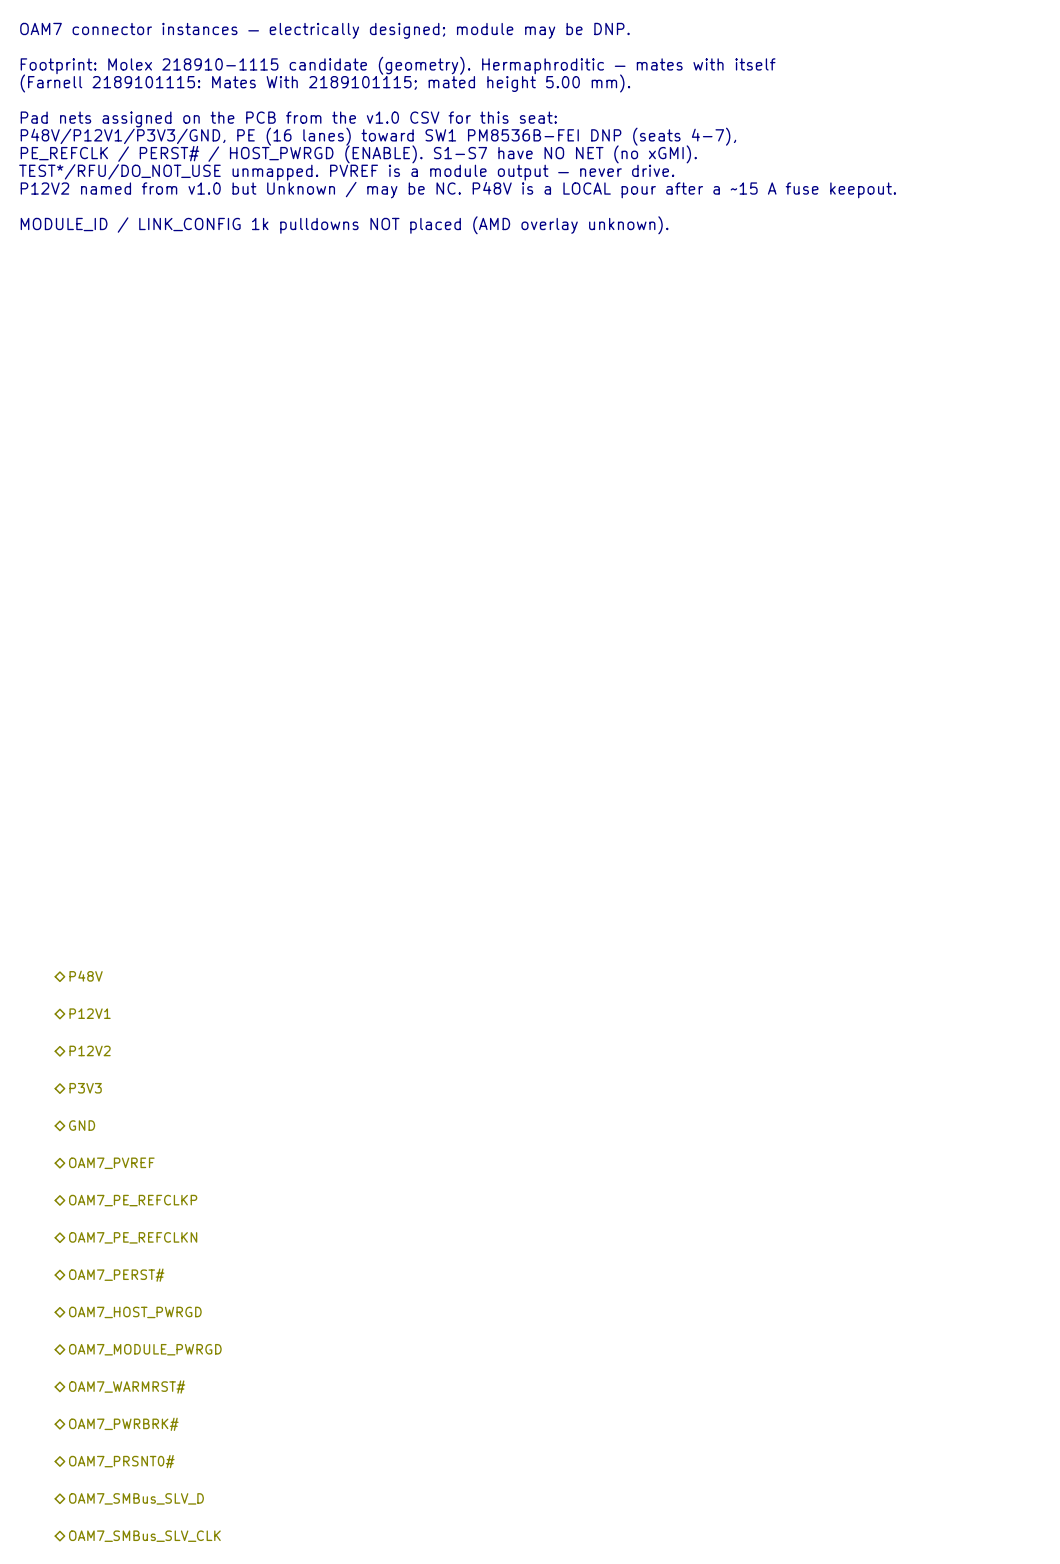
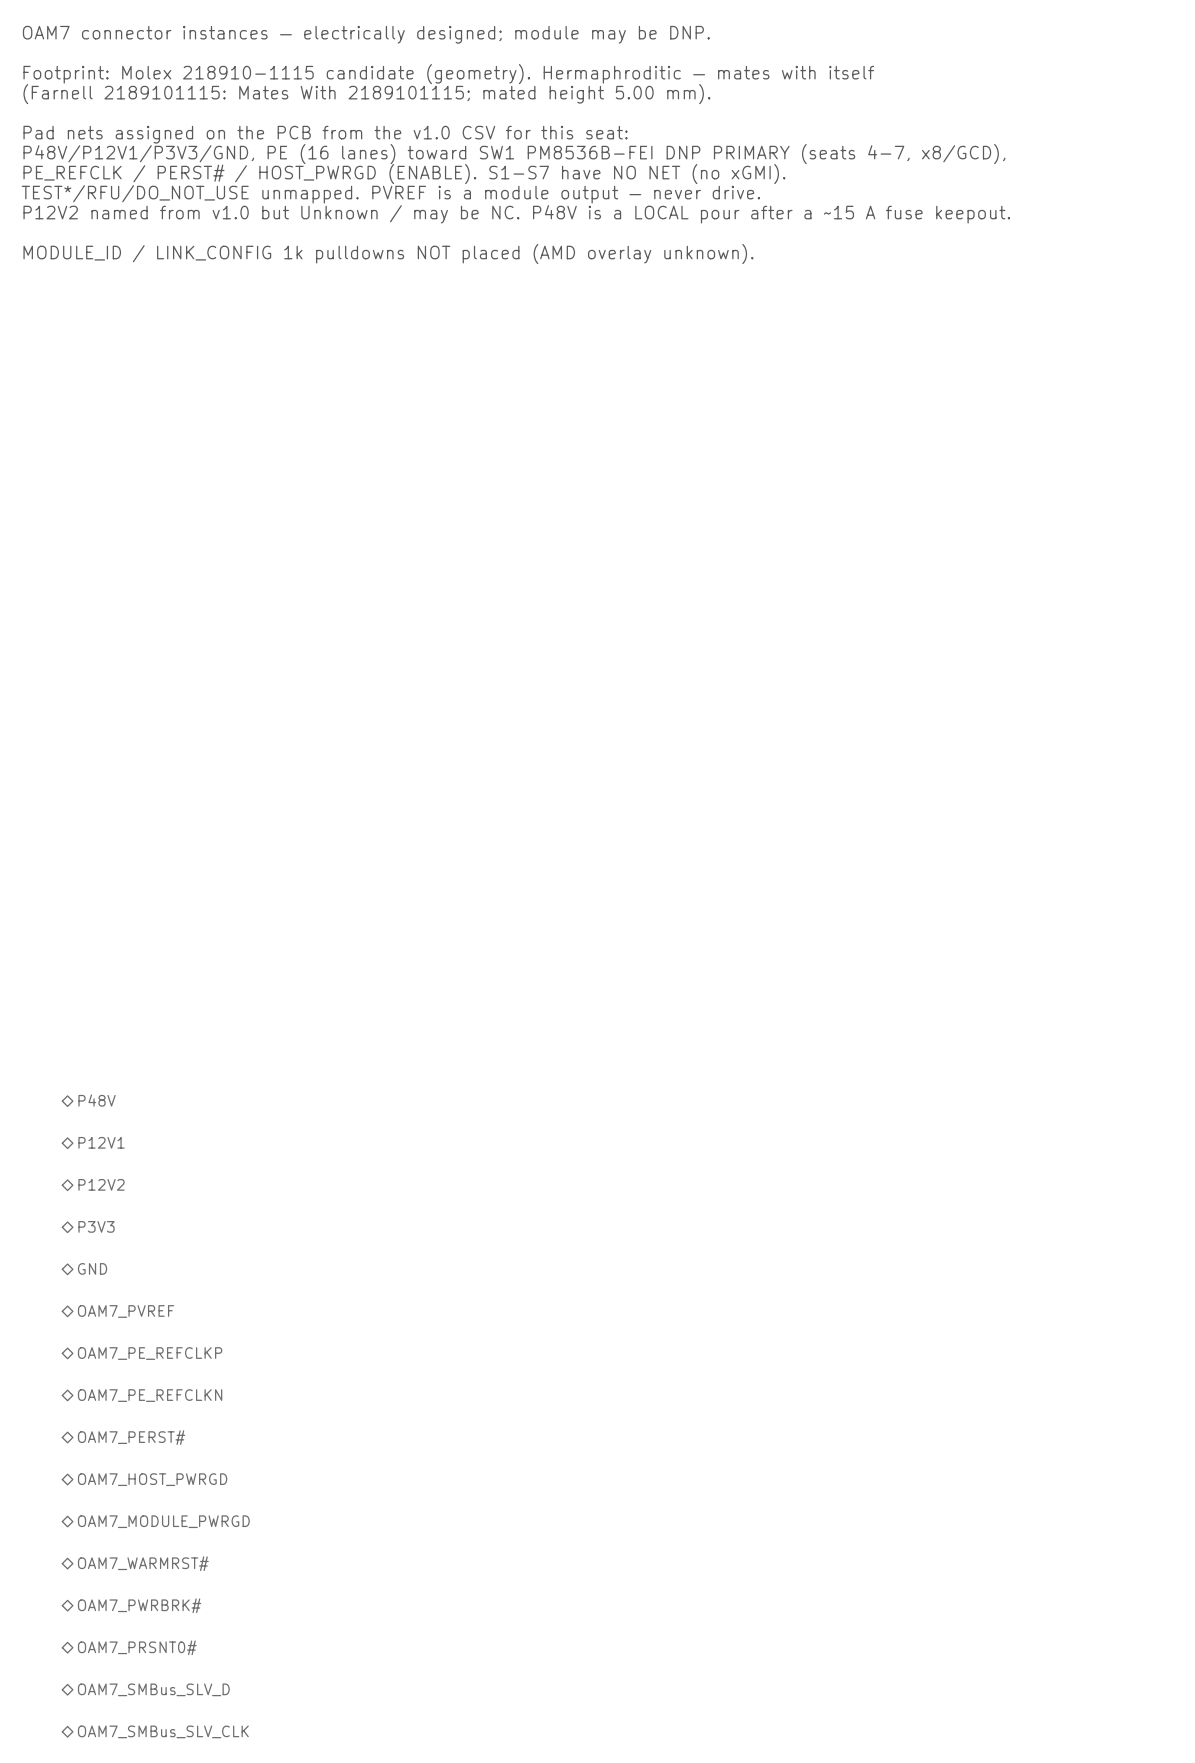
text: P48V/P12V1/P3V3/GND, PE (16 lanes) toward SW1 PM8536B-FEI DNP (seats 4-7), (378, 136) -> P48V/P12V1/P3V3/GND, PE (16 lanes) toward SW1 PM8536B-FEI DNP PRIMARY (seats 4-7, x8/GCD), (514, 154)

